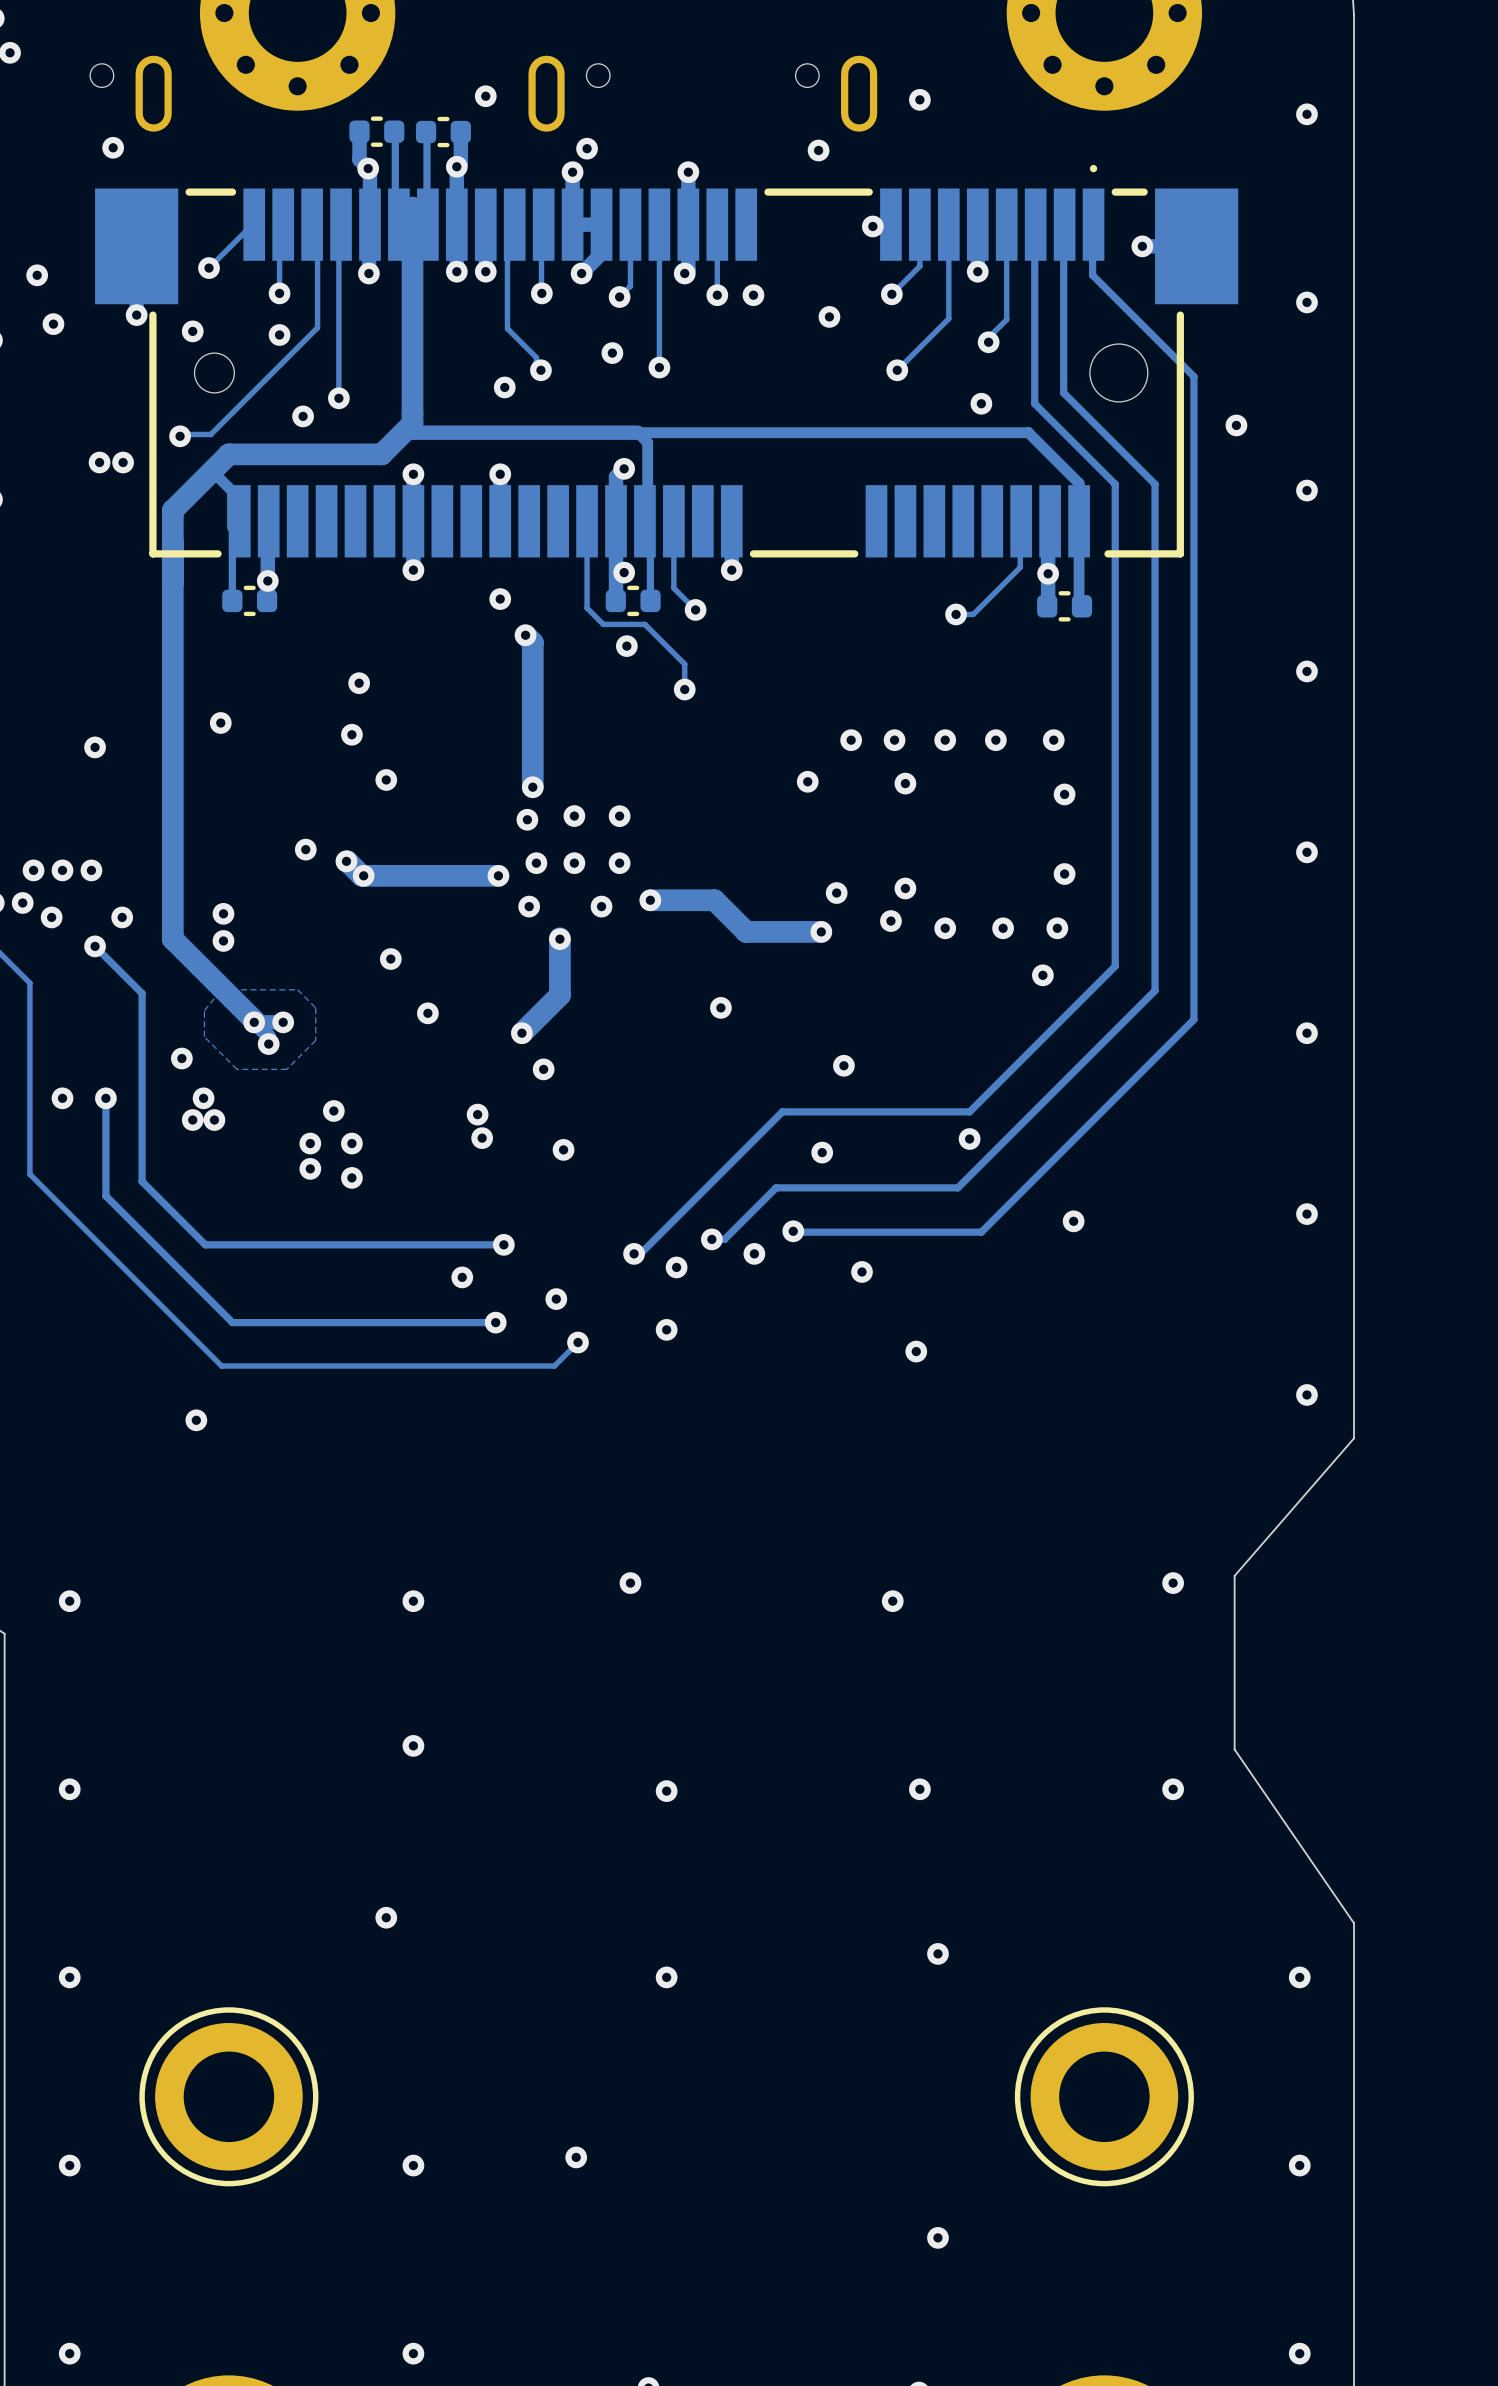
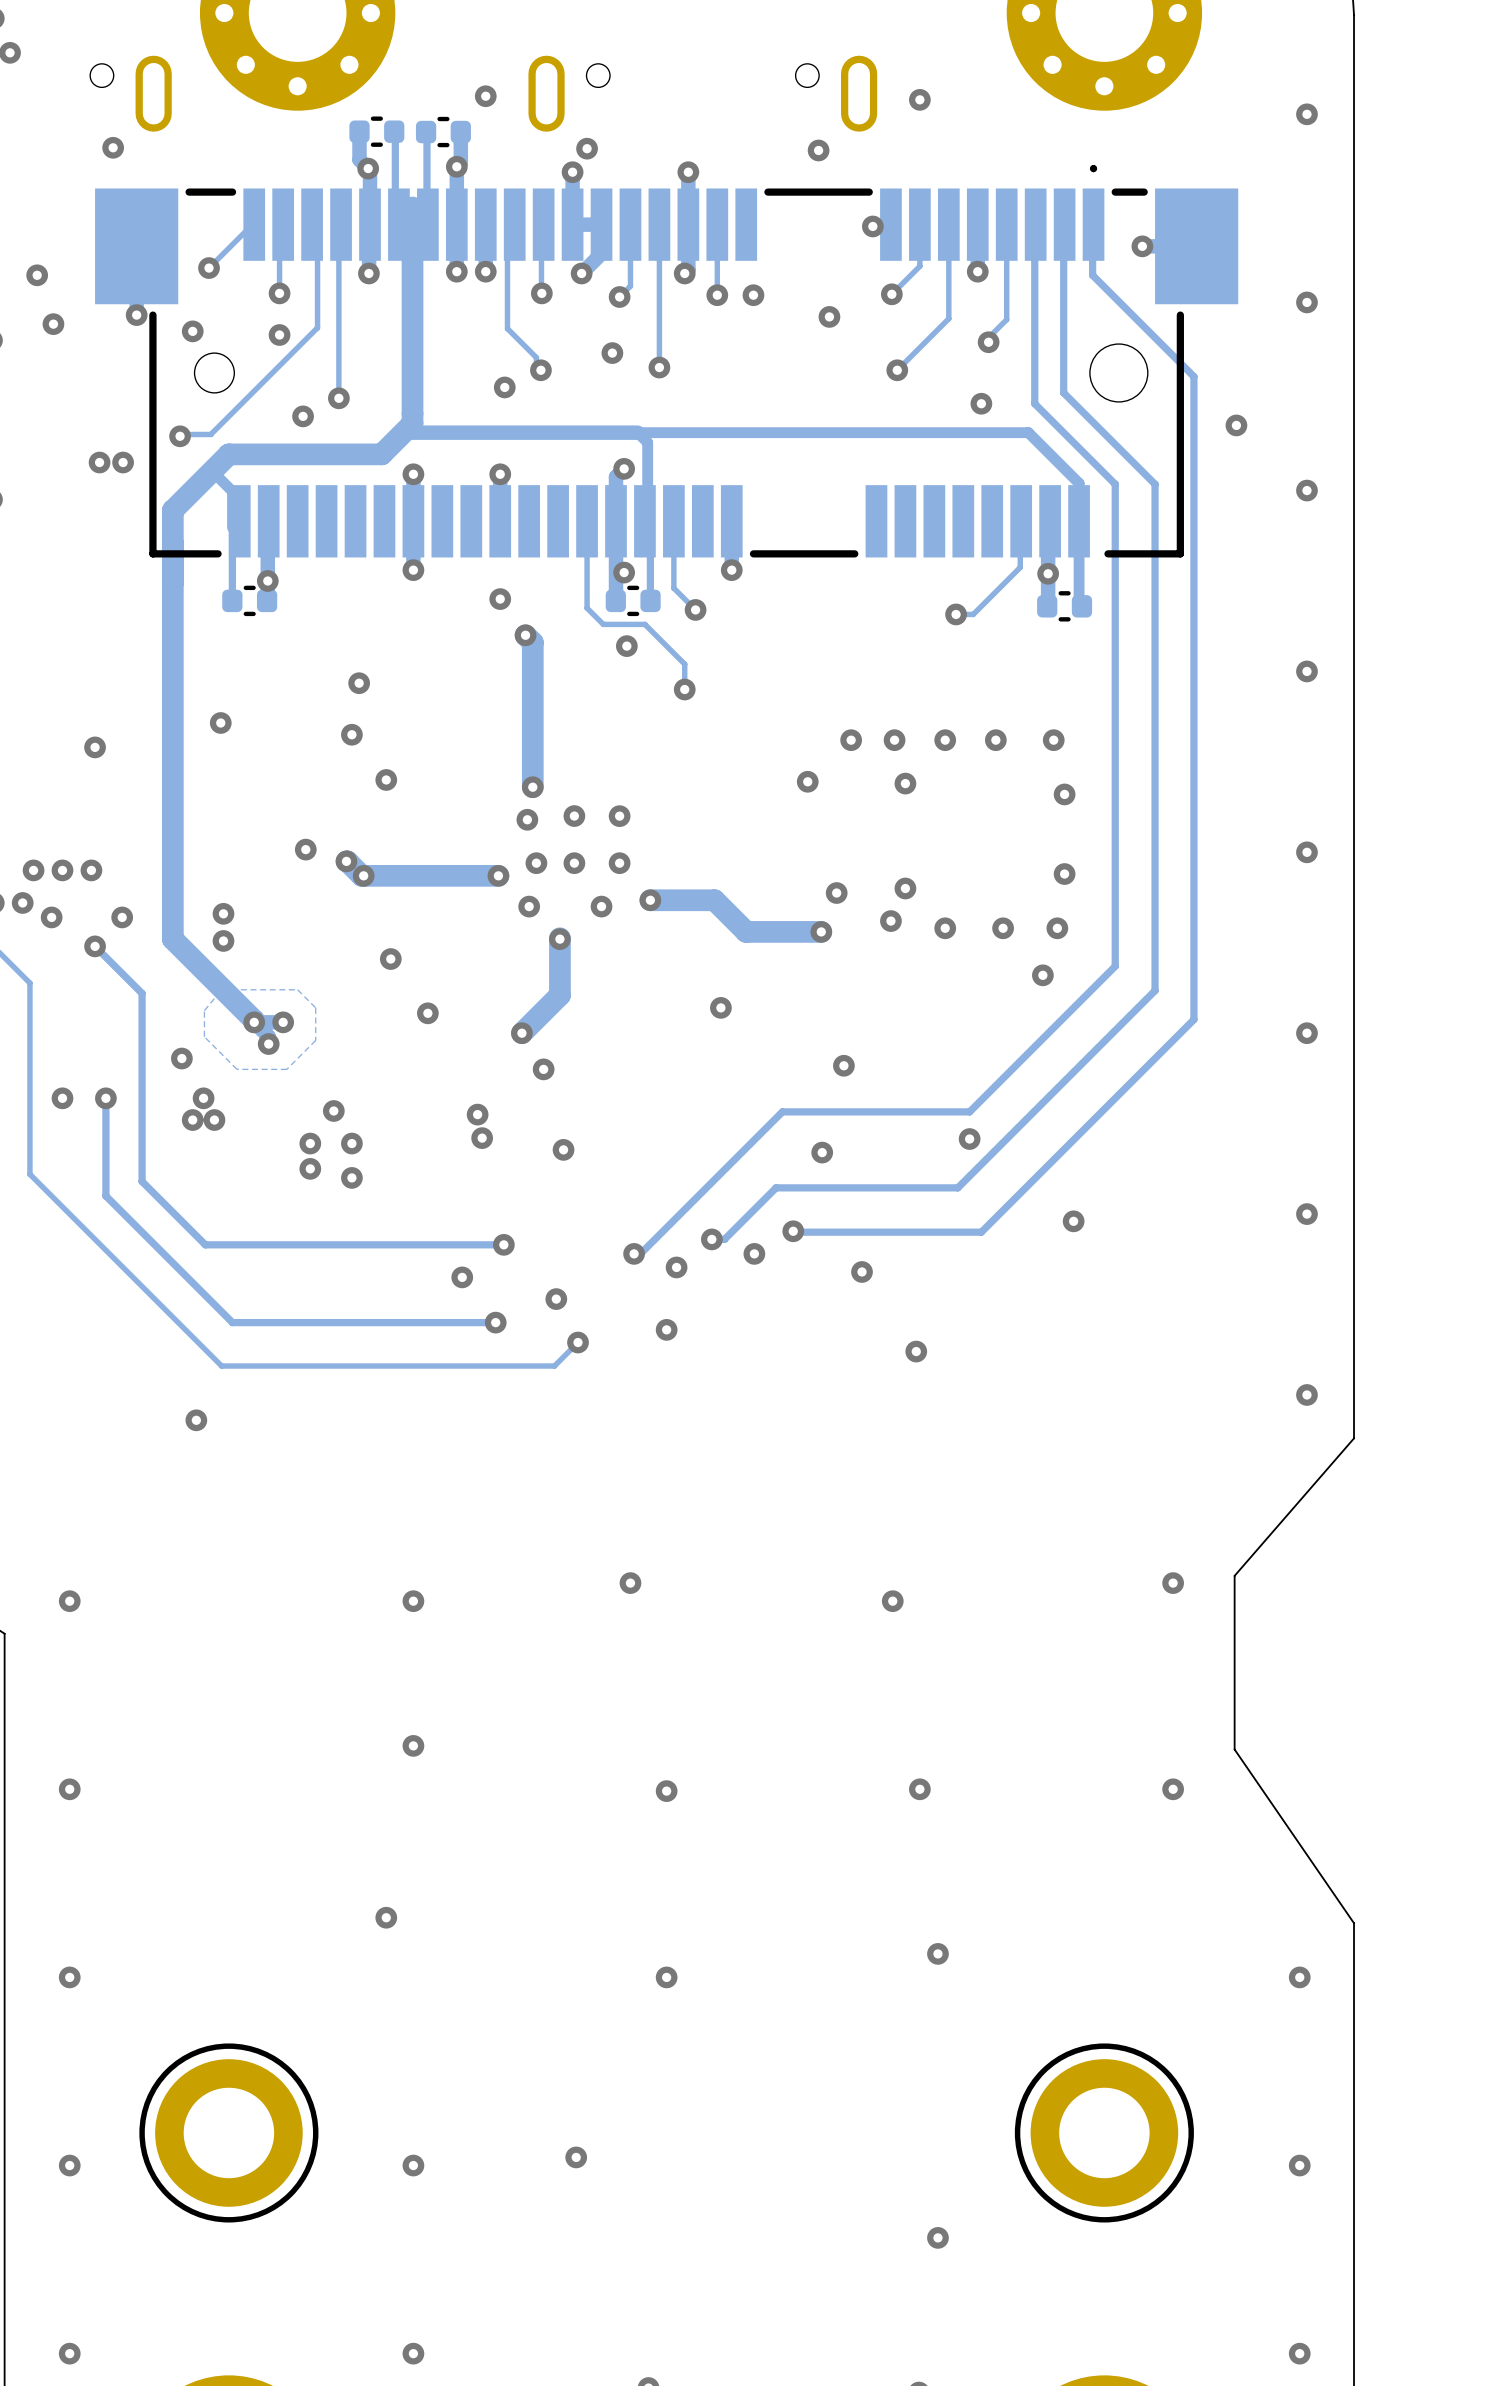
part position: (228, 2096) -> (228, 2132)
part position: (1104, 2096) -> (1104, 2132)

